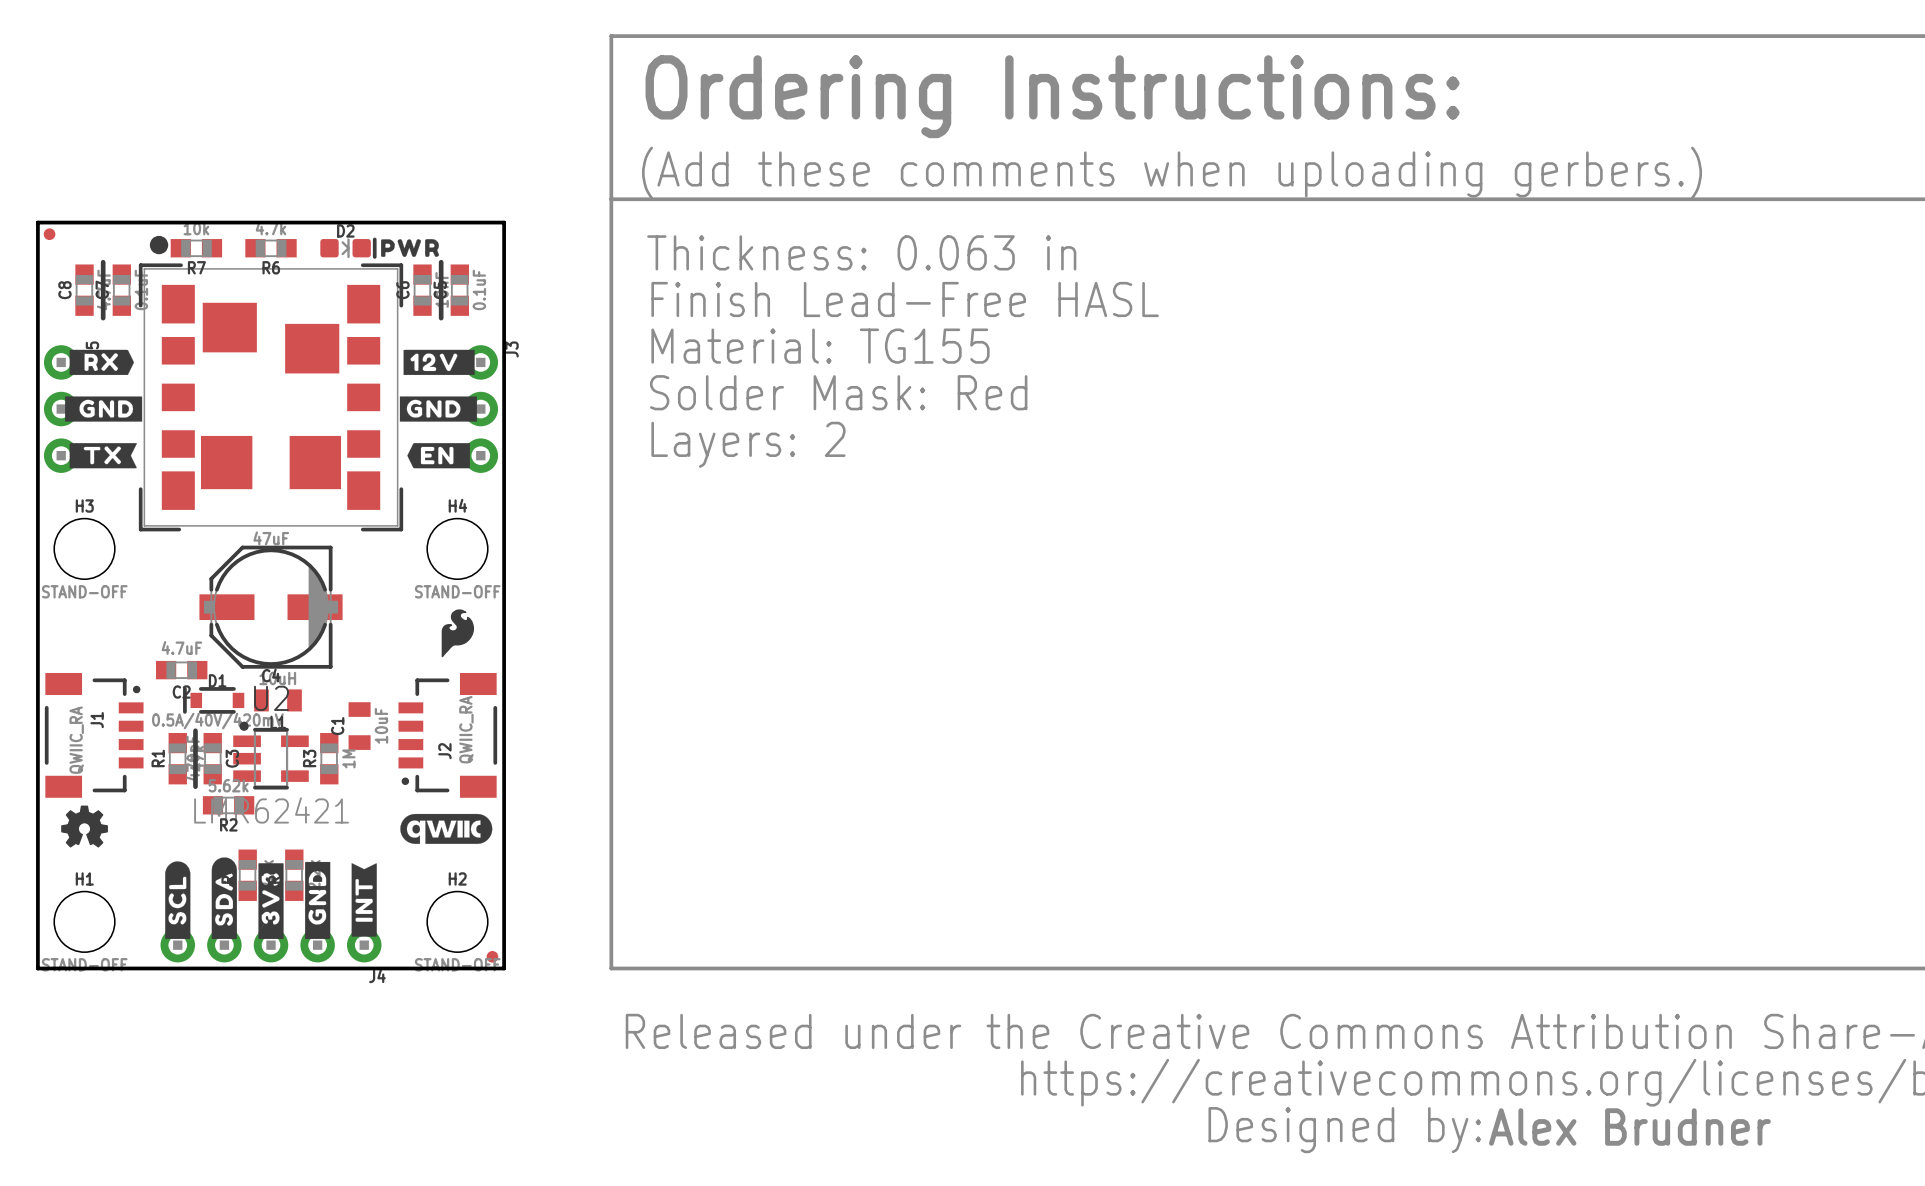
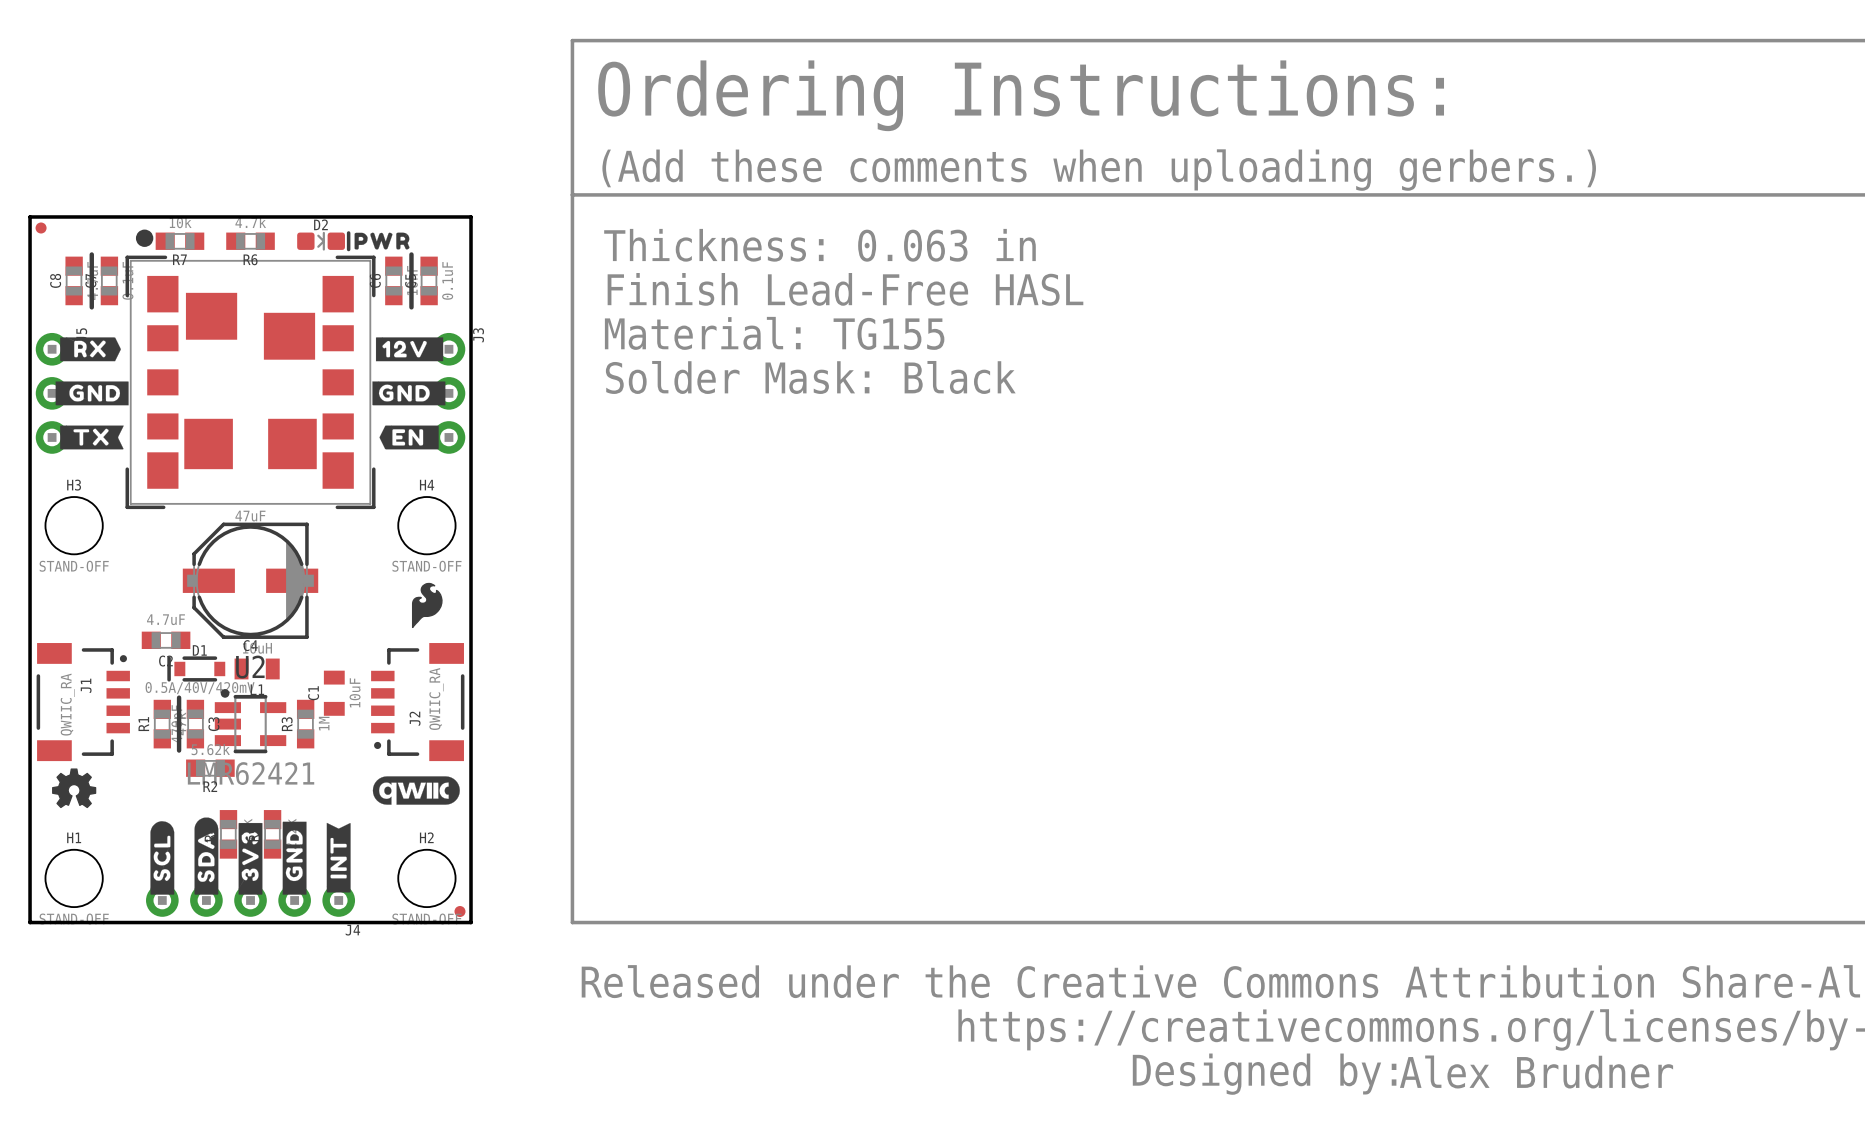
text: Solder Mask: Red (838, 392) -> Solder Mask: Black (810, 377)
text: Layers: 2 (748, 444) -> none

